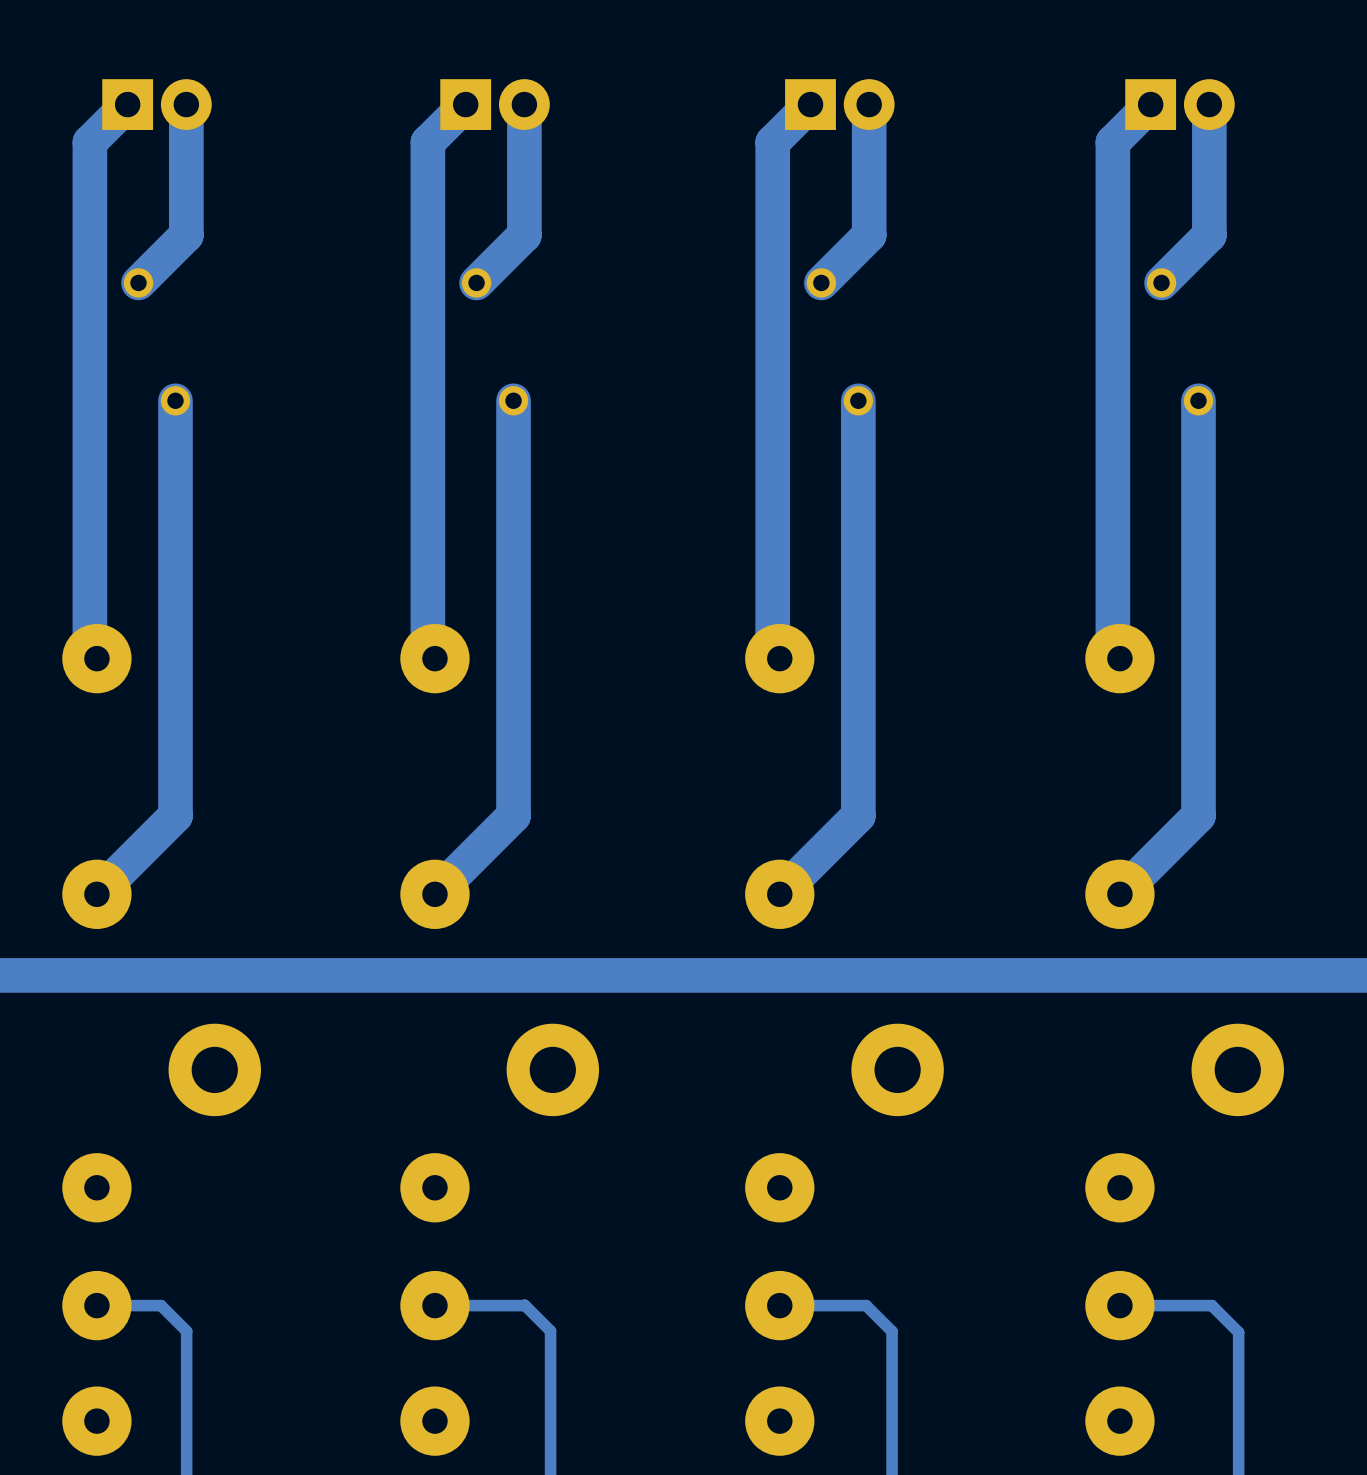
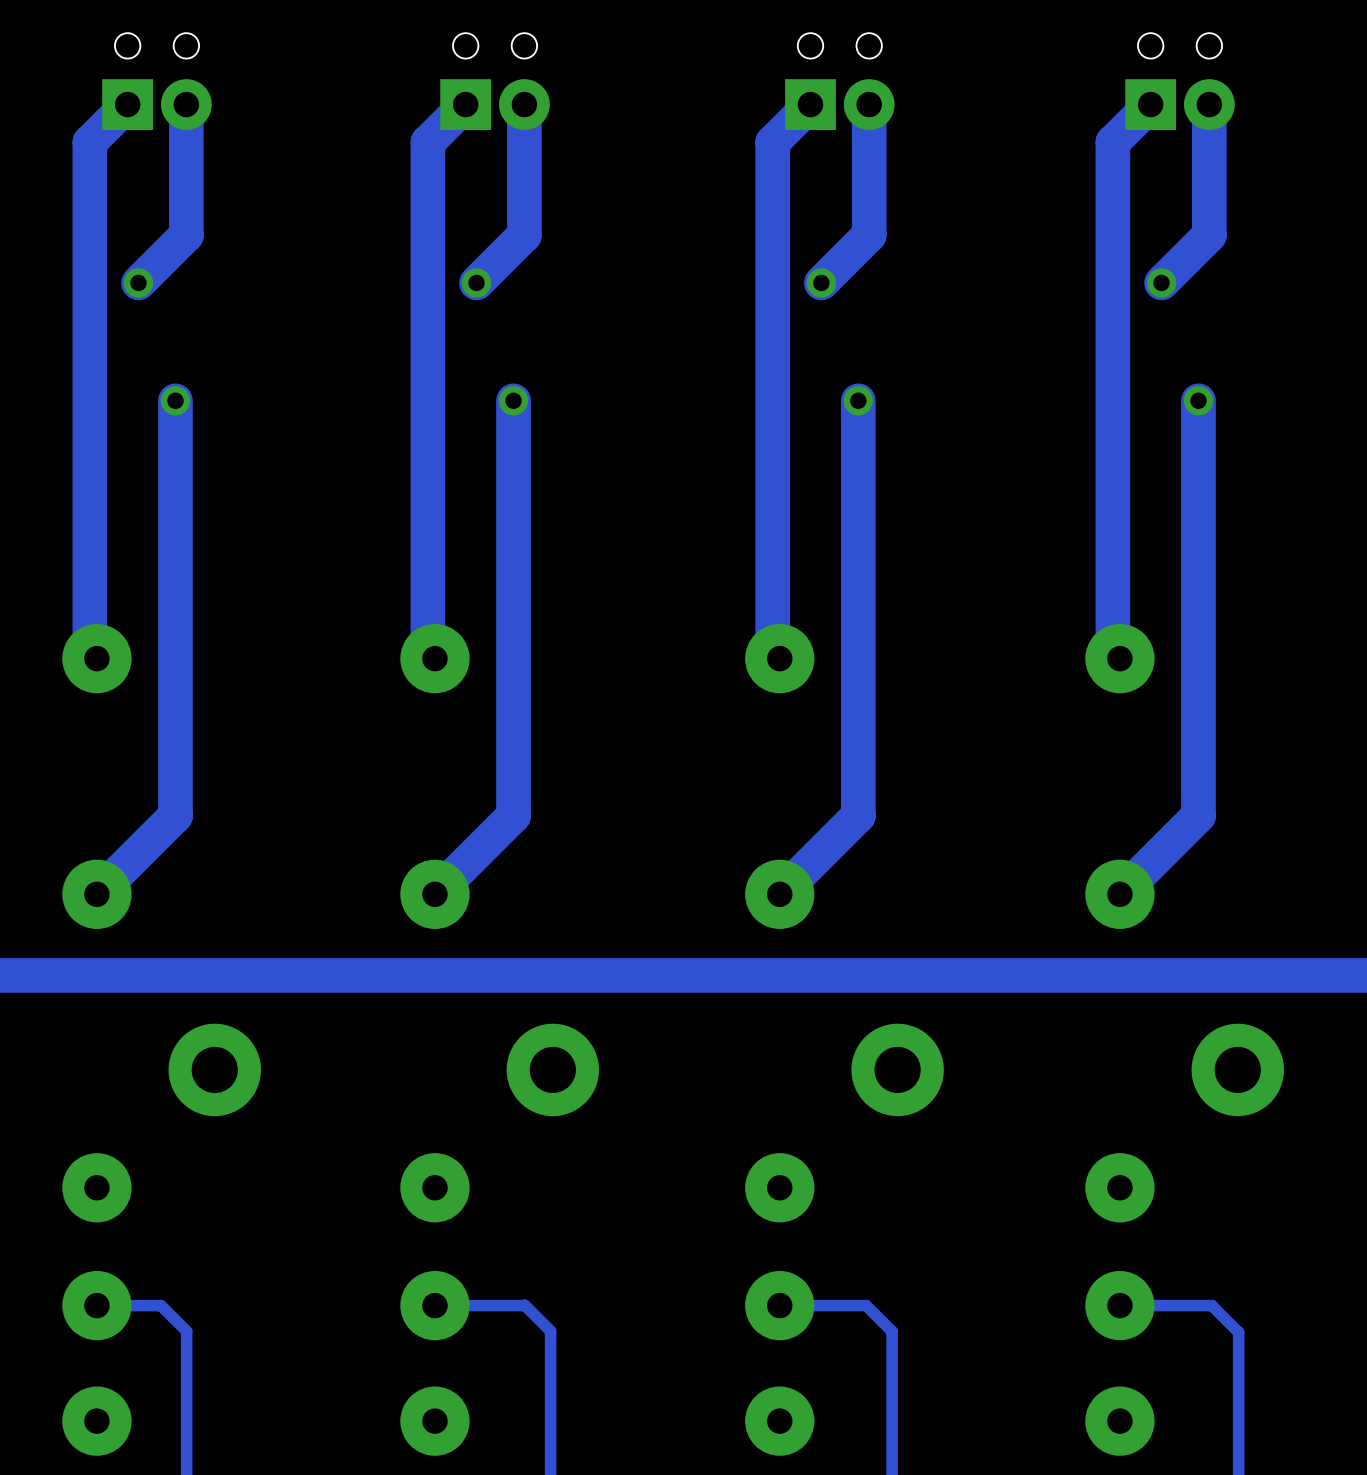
part footprint: [102, 79, 212, 130] -> [102, 33, 212, 130]
part footprint: [440, 79, 550, 130] -> [440, 33, 550, 130]
part footprint: [785, 79, 895, 130] -> [785, 33, 895, 130]
part footprint: [1125, 79, 1235, 130] -> [1125, 33, 1235, 130]

